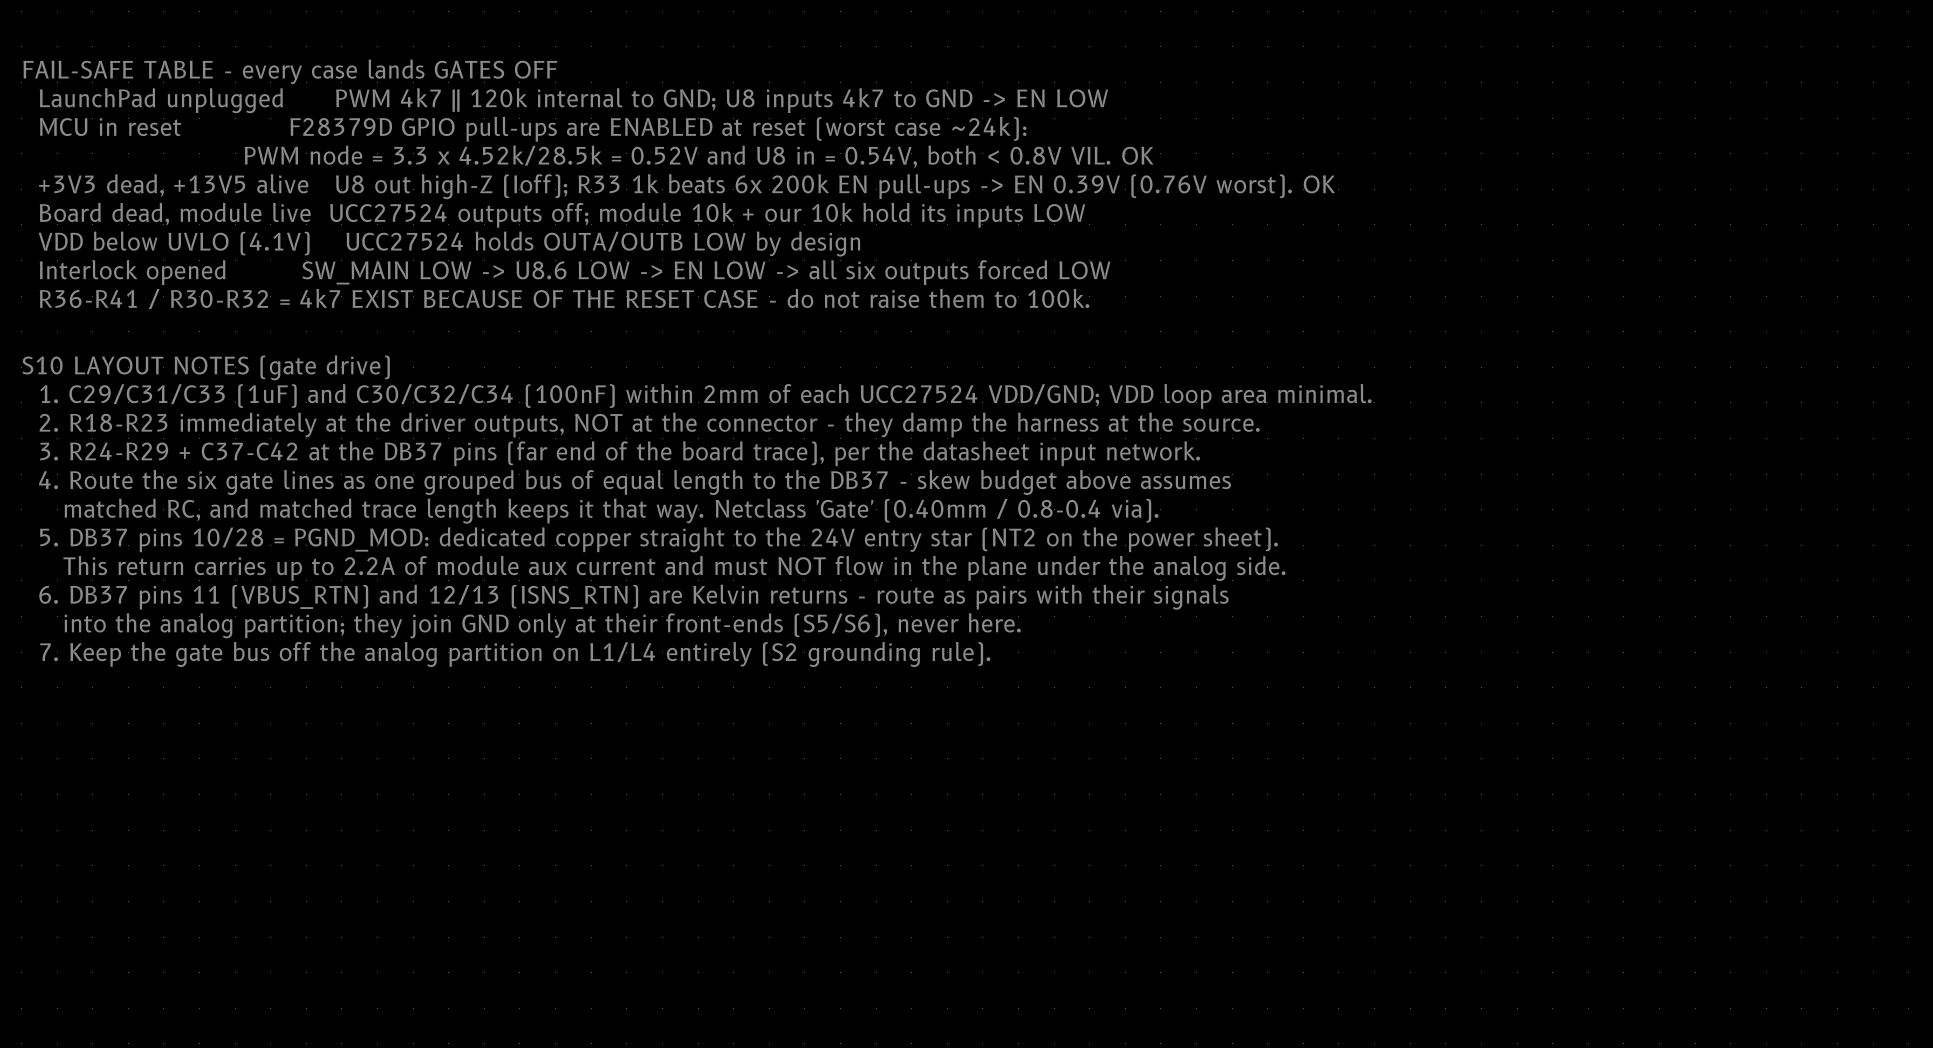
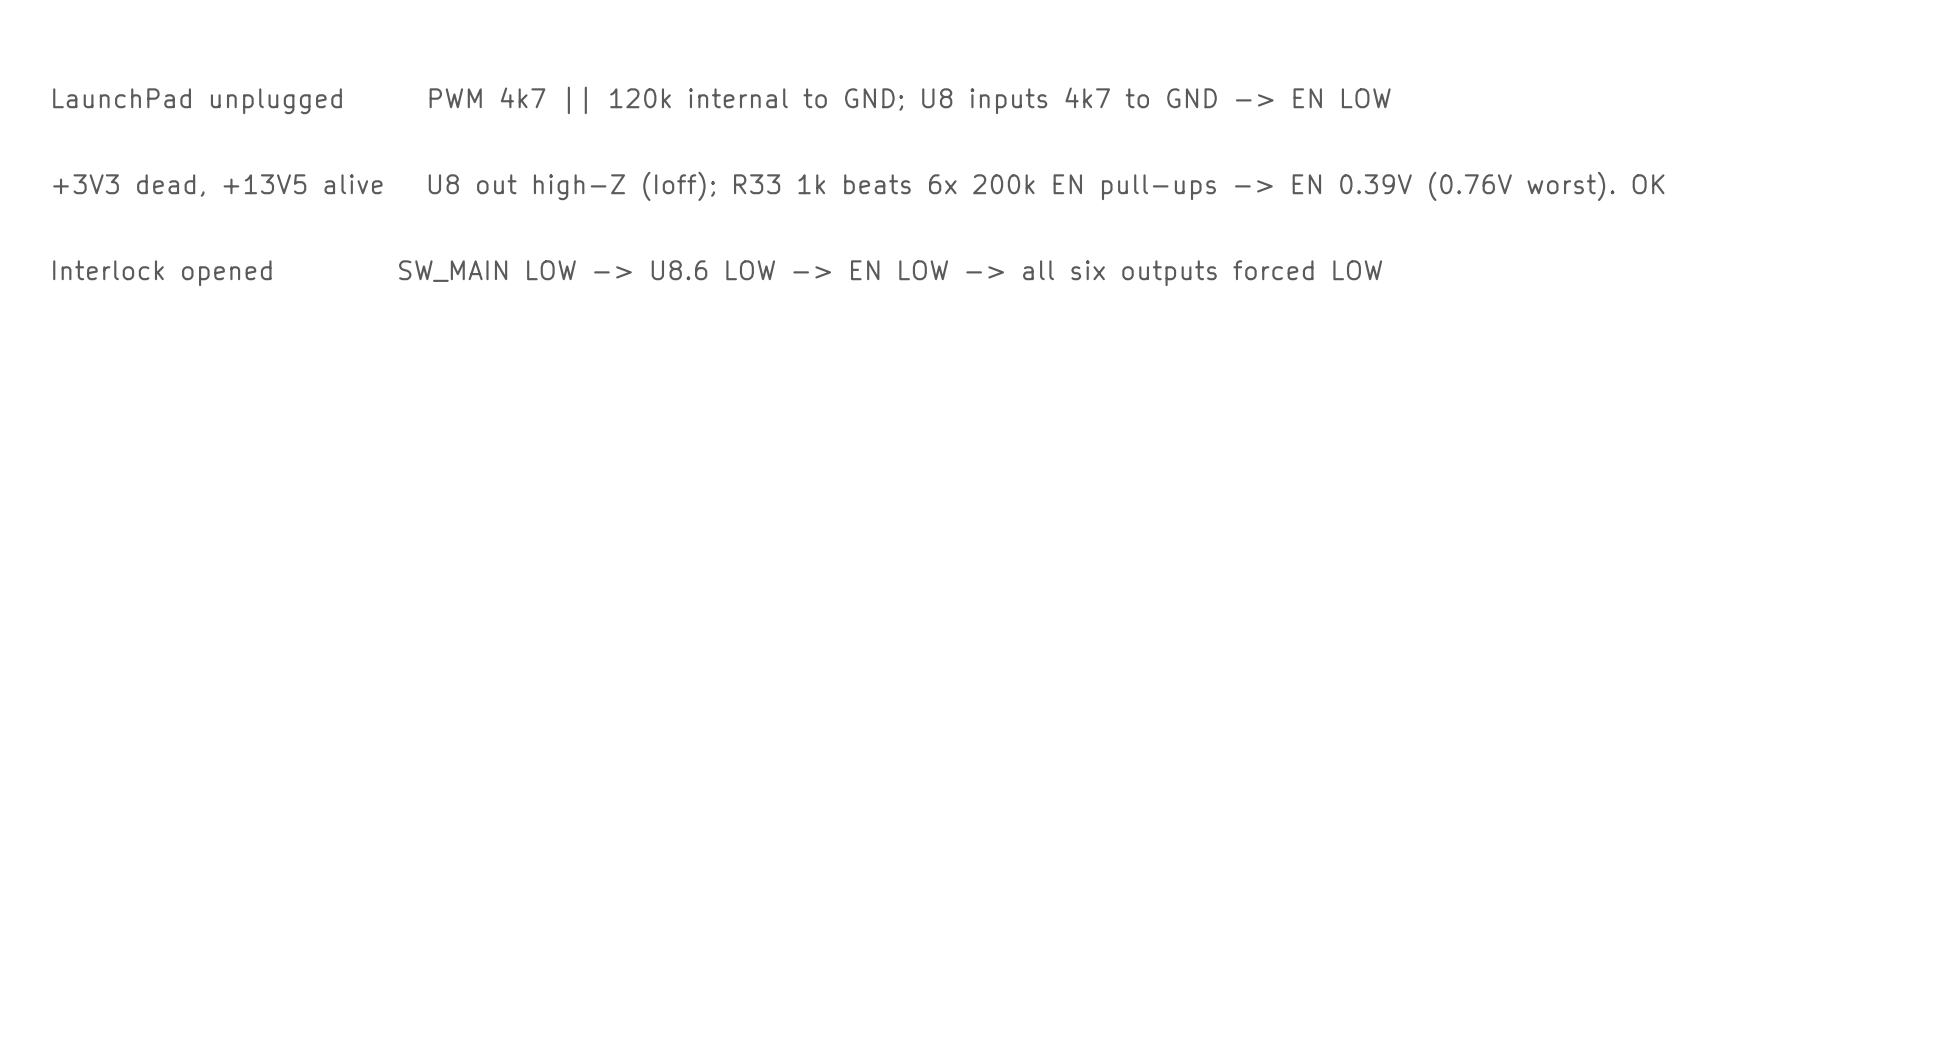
text: FAIL-SAFE TABLE - every case lands GATES OFF (290, 71) -> none
text: MCU in reset F28379D GPIO pull-ups are ENABLED at reset (worst case ~24k): (533, 129) -> none
text: PWM node = 3.3 x 4.52k/28.5k = 0.52V and U8 in = 0.54V, both < 0.8V VIL. OK (699, 156) -> none
text: Board dead, module live UCC27524 outputs off; module 10k + our 10k hold its inputs LOW (562, 215) -> none
text: VDD below UVLO (4.1V) UCC27524 holds OUTA/OUTB LOW by design (449, 244) -> none
text: R36-R41 / R30-R32 = 4k7 EXIST BECAUSE OF THE RESET CASE - do not raise them to 100k. (564, 298) -> none
text: S10 LAYOUT NOTES (gate drive) (206, 367) -> none
text: 1. C29/C31/C33 (1uF) and C30/C32/C34 (100nF) within 2mm of each UCC27524 VDD/GND; VDD loop area minimal. (705, 396) -> none
text: 2. R18-R23 immediately at the driver outputs, NOT at the connector - they damp the harness at the source. (649, 425) -> none
text: 3. R24-R29 + C37-C42 at the DB37 pins (far end of the board trace), per the datasheet input network. (620, 453) -> none
text: 4. Route the six gate lines as one grouped bus of equal length to the DB37 - skew budget above assumes (634, 482) -> none
text: matched RC, and matched trace length keeps it that way. Netclass 'Gate' (0.40mm / 0.8-0.4 via). (611, 511) -> none
text: 5. DB37 pins 10/28 = PGND_MOD: dedicated copper straight to the 24V entry star (NT2 on the power sheet). (659, 539) -> none
text: This return carries up to 2.2A of module aux current and must NOT flow in the plane under the analog side. (674, 568) -> none
text: 6. DB37 pins 11 (VBUS_RTN) and 12/13 (ISNS_RTN) are Kelvin returns - route as pairs with their signals (633, 597) -> none
text: into the analog partition; they join GND only at their front-ends (S5/S6), never here. (542, 625) -> none
text: 7. Keep the gate bus off the analog partition on L1/L4 entirely (S2 grounding rule). (515, 654) -> none

